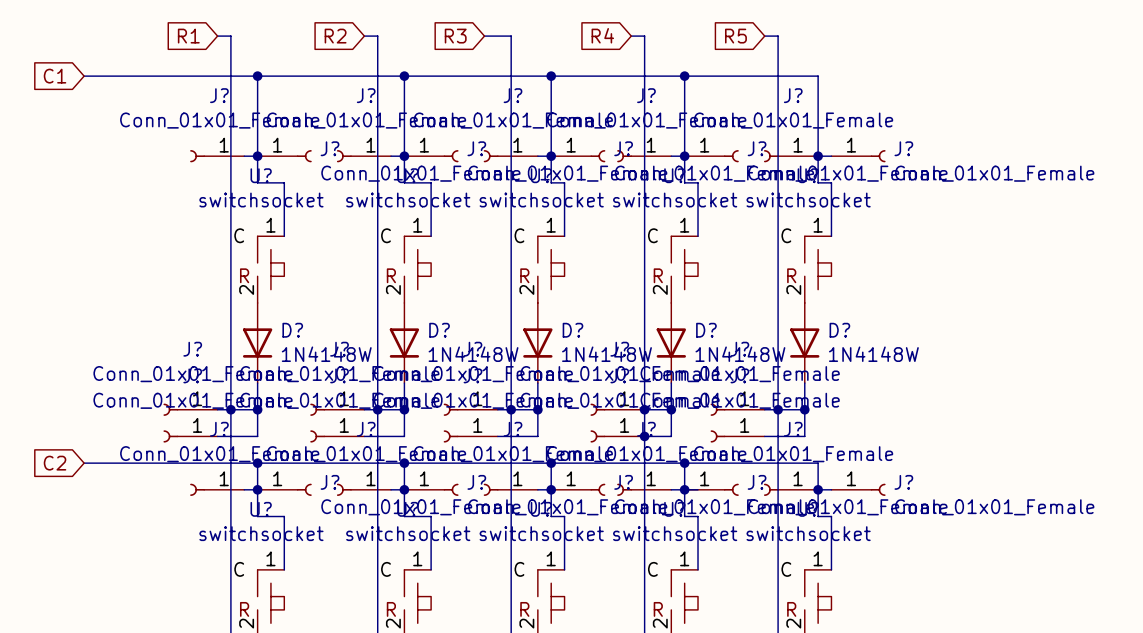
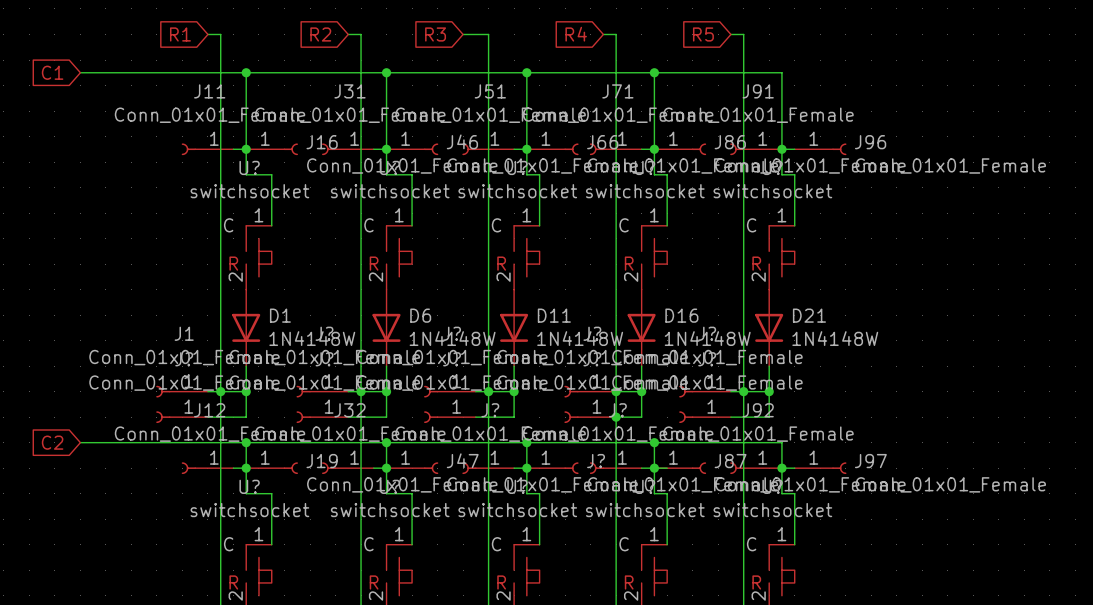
J? name: J? (219, 95) -> J11 (209, 91)
J? name: J? (366, 95) -> J31 (350, 91)
J? name: J? (512, 95) -> J51 (490, 91)
J? name: J? (646, 95) -> J71 (617, 91)
J? name: J? (793, 95) -> J91 (758, 91)
J? name: J? (330, 148) -> J16 (322, 142)
J? name: J? (476, 148) -> J46 (462, 141)
J? name: J? (623, 148) -> J66 (602, 142)
J? name: J? (757, 148) -> J86 (730, 142)
J? name: J? (903, 148) -> J96 (870, 142)
D? name: D? (292, 330) -> D1 (280, 315)
D? name: D? (439, 330) -> D6 (420, 315)
D? name: D? (572, 330) -> D11 (554, 315)
D? name: D? (706, 330) -> D16 (681, 315)
D? name: D? (839, 330) -> D21 (809, 315)
J? name: J? (192, 349) -> J1 (184, 333)
J? name: J? (219, 429) -> J12 (209, 410)
J? name: J? (366, 429) -> J32 (350, 410)
J? name: J? (793, 429) -> J92 (758, 410)
J? name: J? (330, 482) -> J19 (322, 461)
J? name: J? (476, 482) -> J47 (462, 460)
J? name: J? (757, 482) -> J87 (730, 461)
J? name: J? (903, 482) -> J97 (870, 461)

